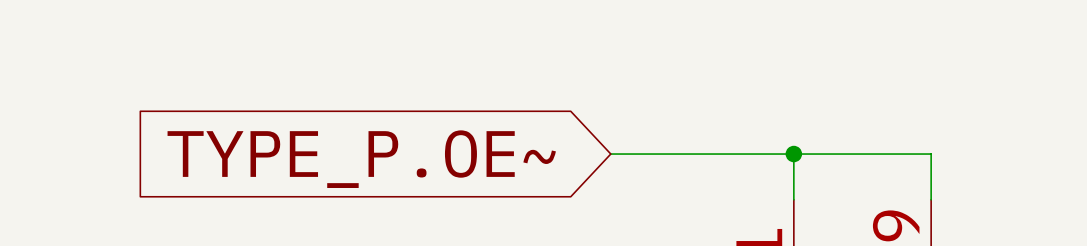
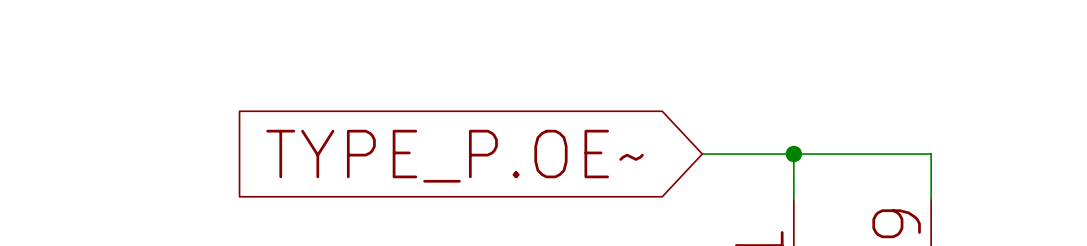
wire: (610, 154) (702, 154) -> none
global label position: TYPE_P.OE~ (361, 159) -> TYPE_P.OE~ (455, 156)

